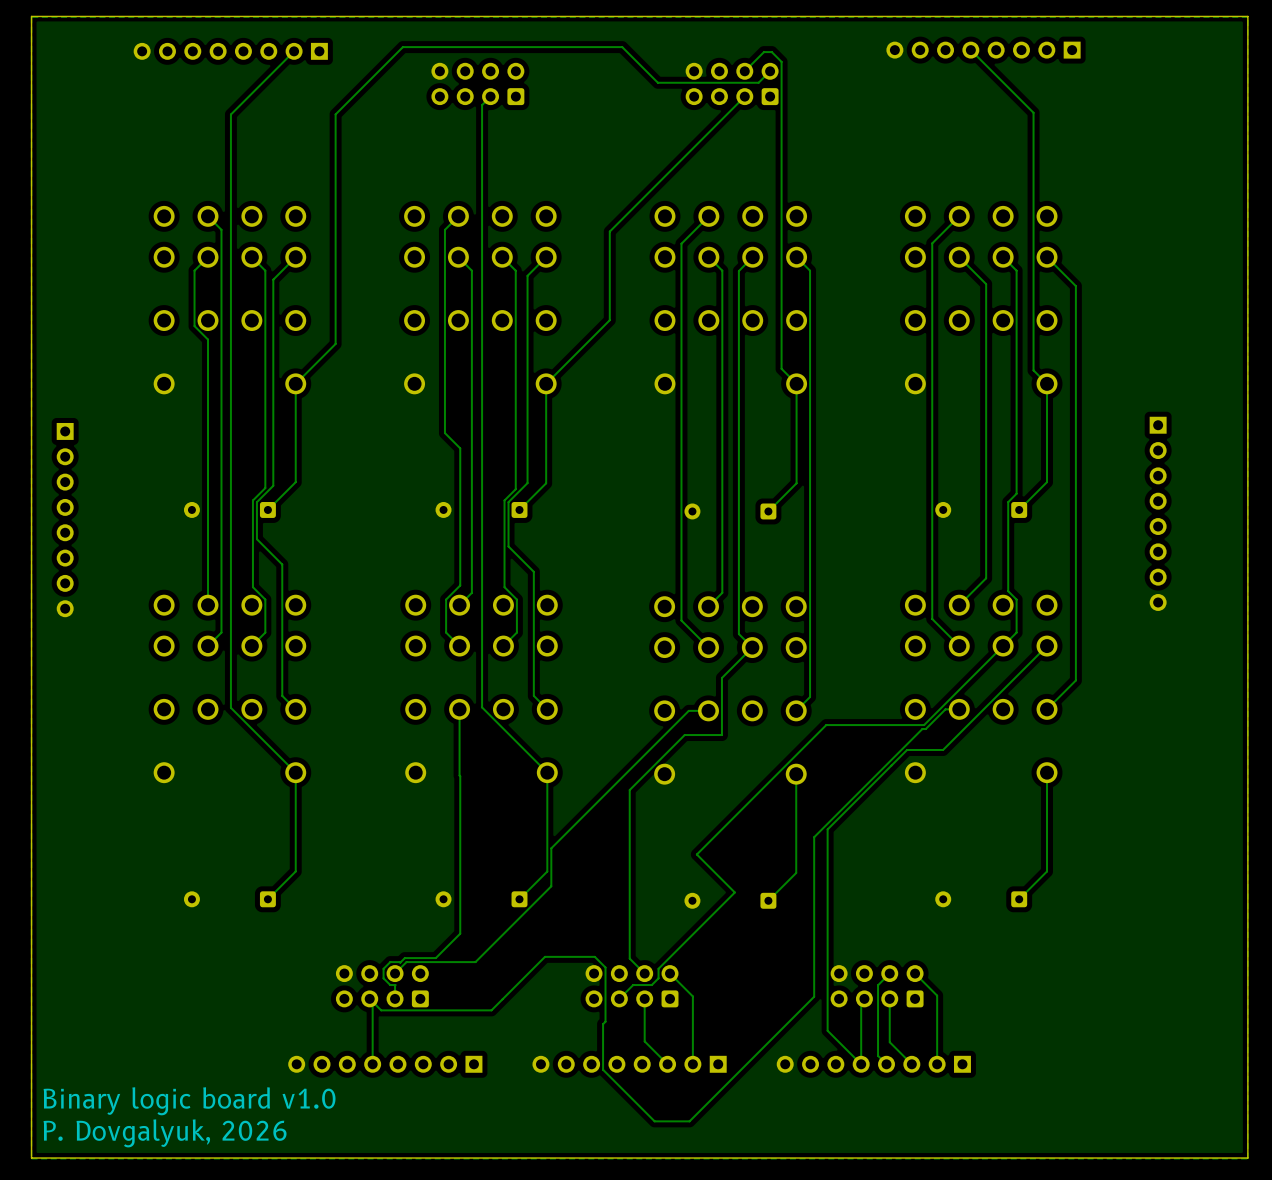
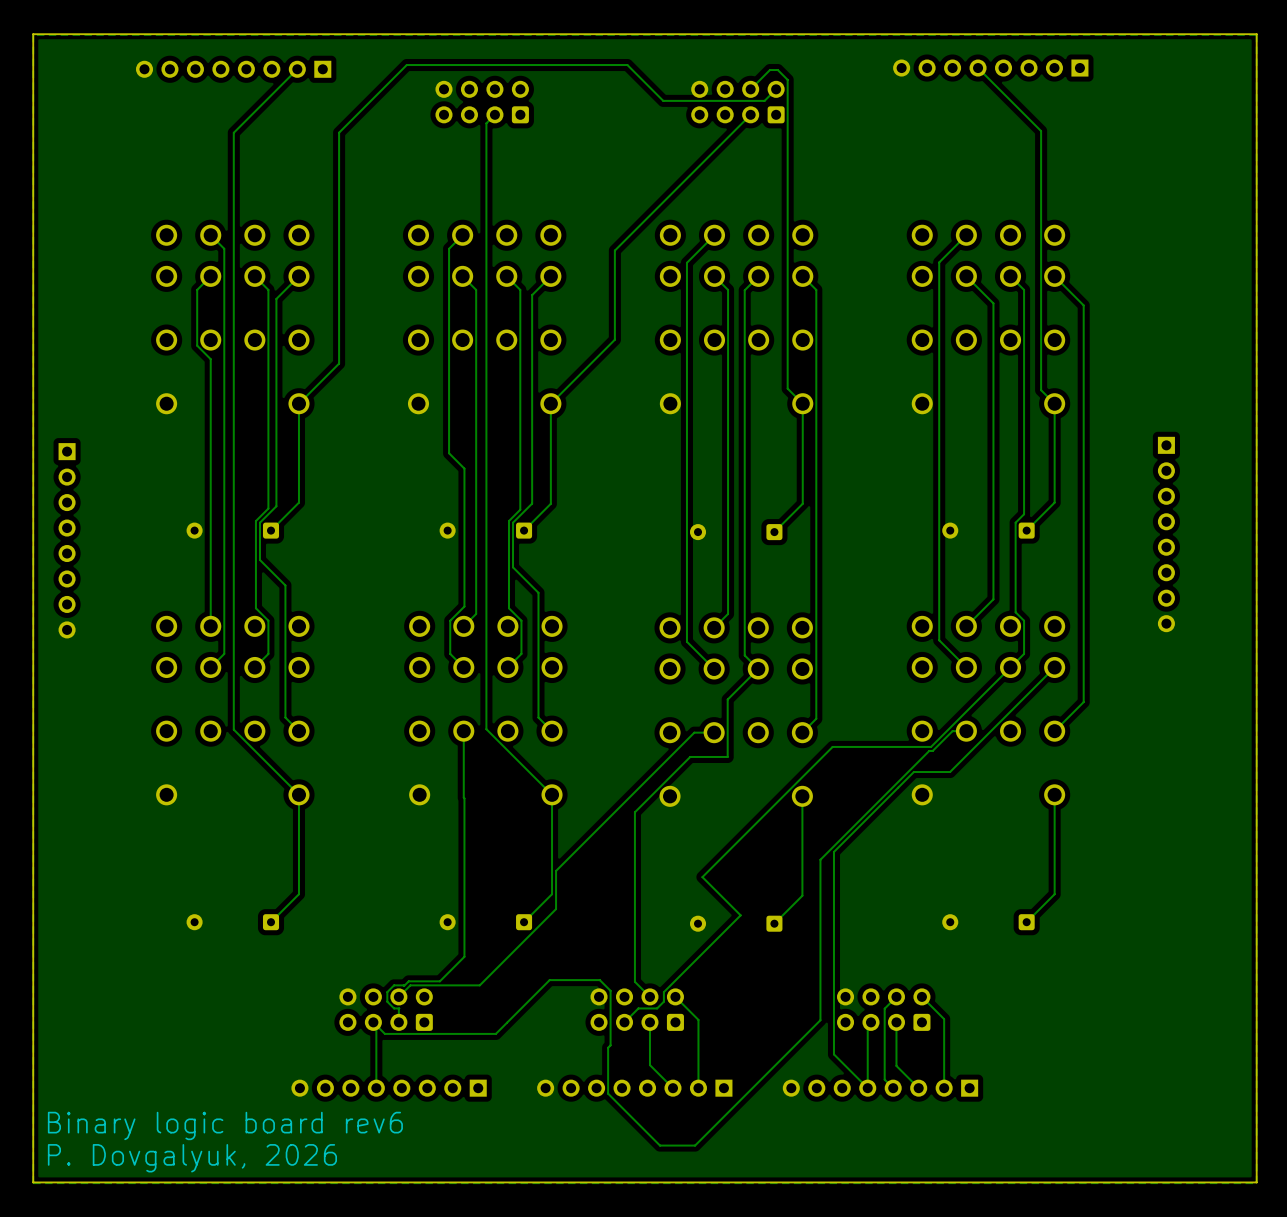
text: Binary logic board v1.0 (189, 1101) -> Binary logic board rev6 (225, 1125)

